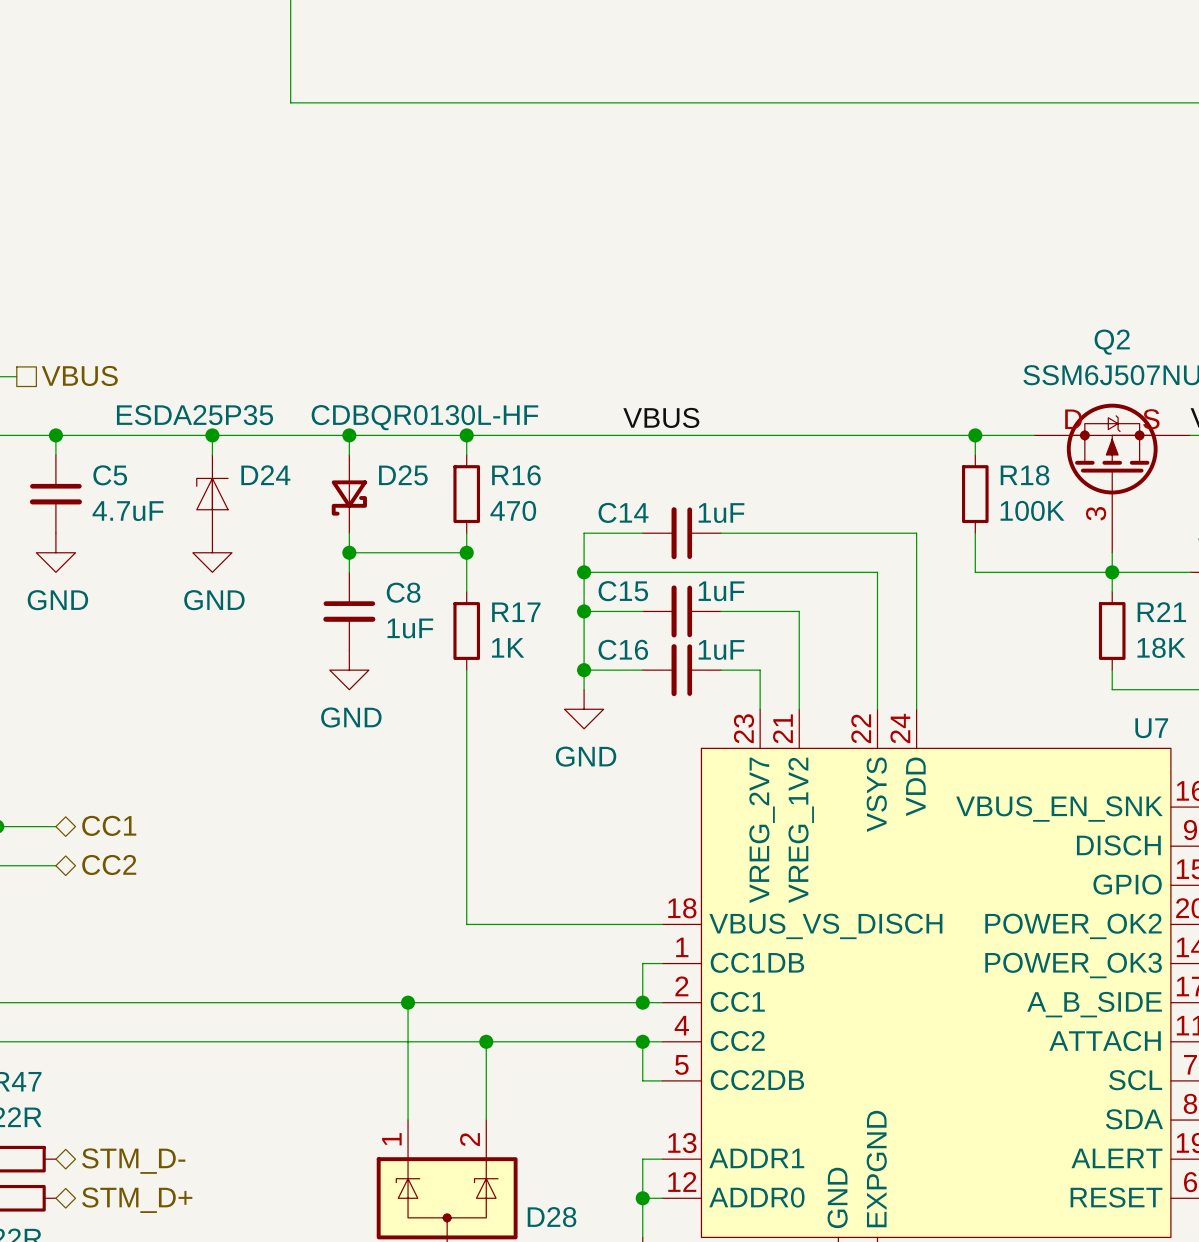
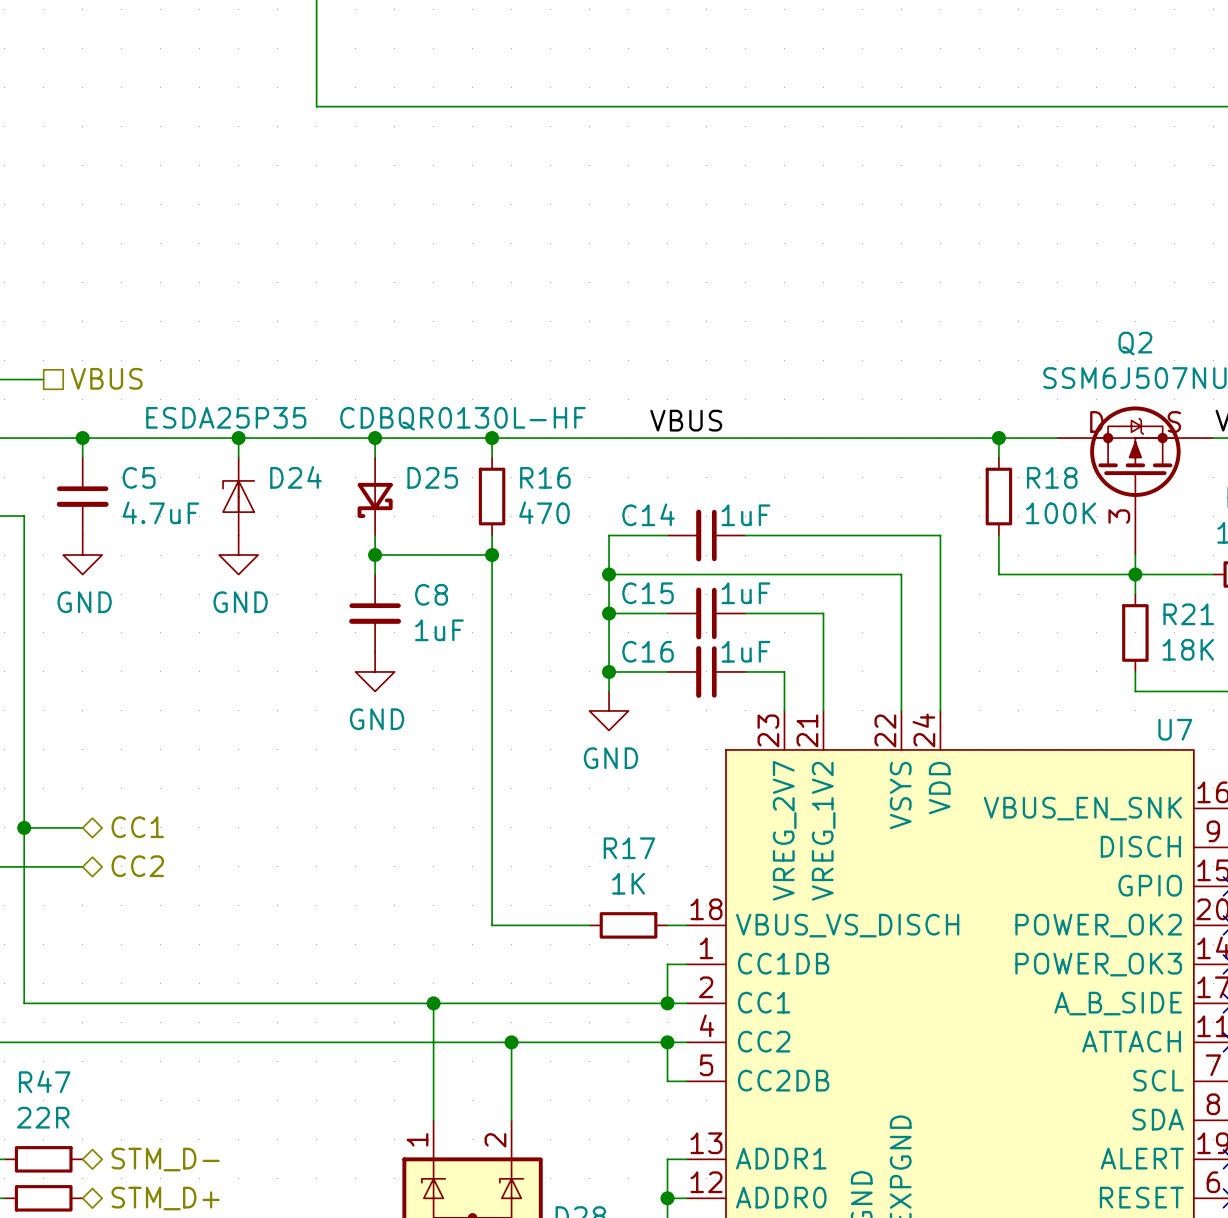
wire: none -> (492, 594) (492, 671)
R17 name position: R17 (516, 612) -> R17 (629, 848)
R17 rotation: 0° (466, 631) -> 90° clockwise (628, 925)
R17 position: (466, 631) -> (628, 925)
R17 value position: 1K (508, 647) -> 1K (628, 883)
wire: (564, 924) (642, 924) -> none

